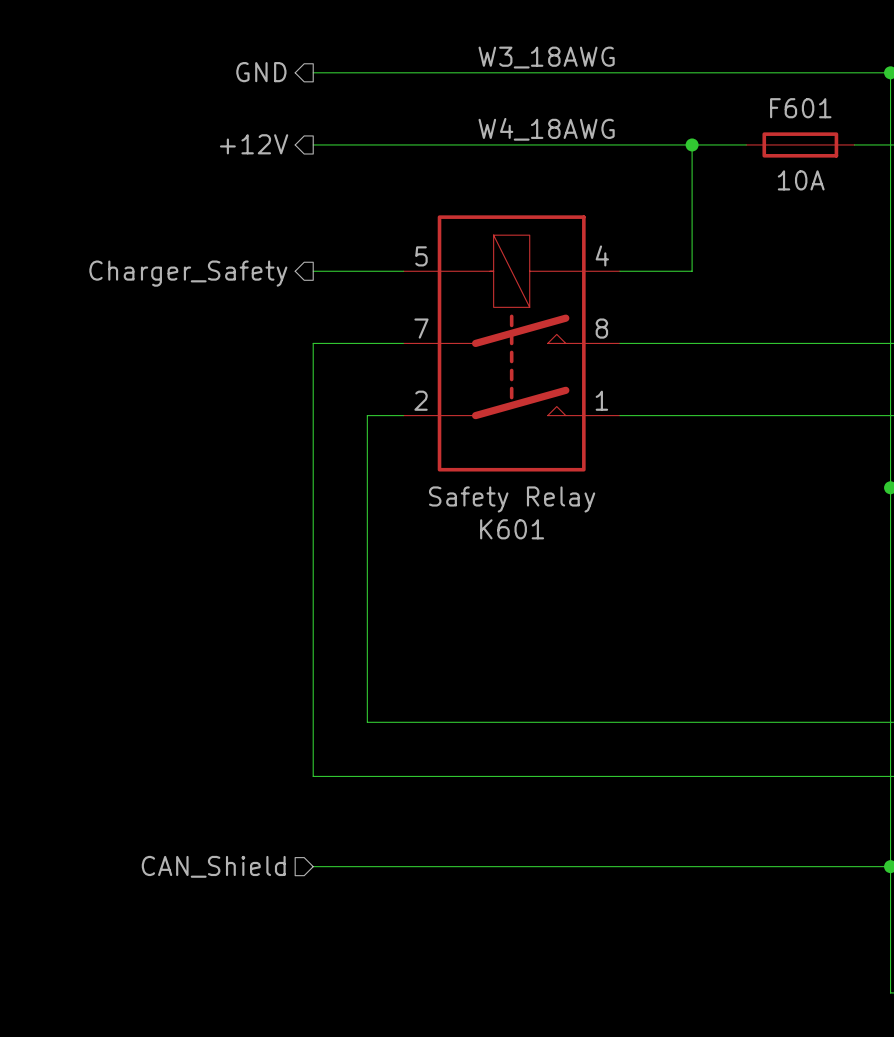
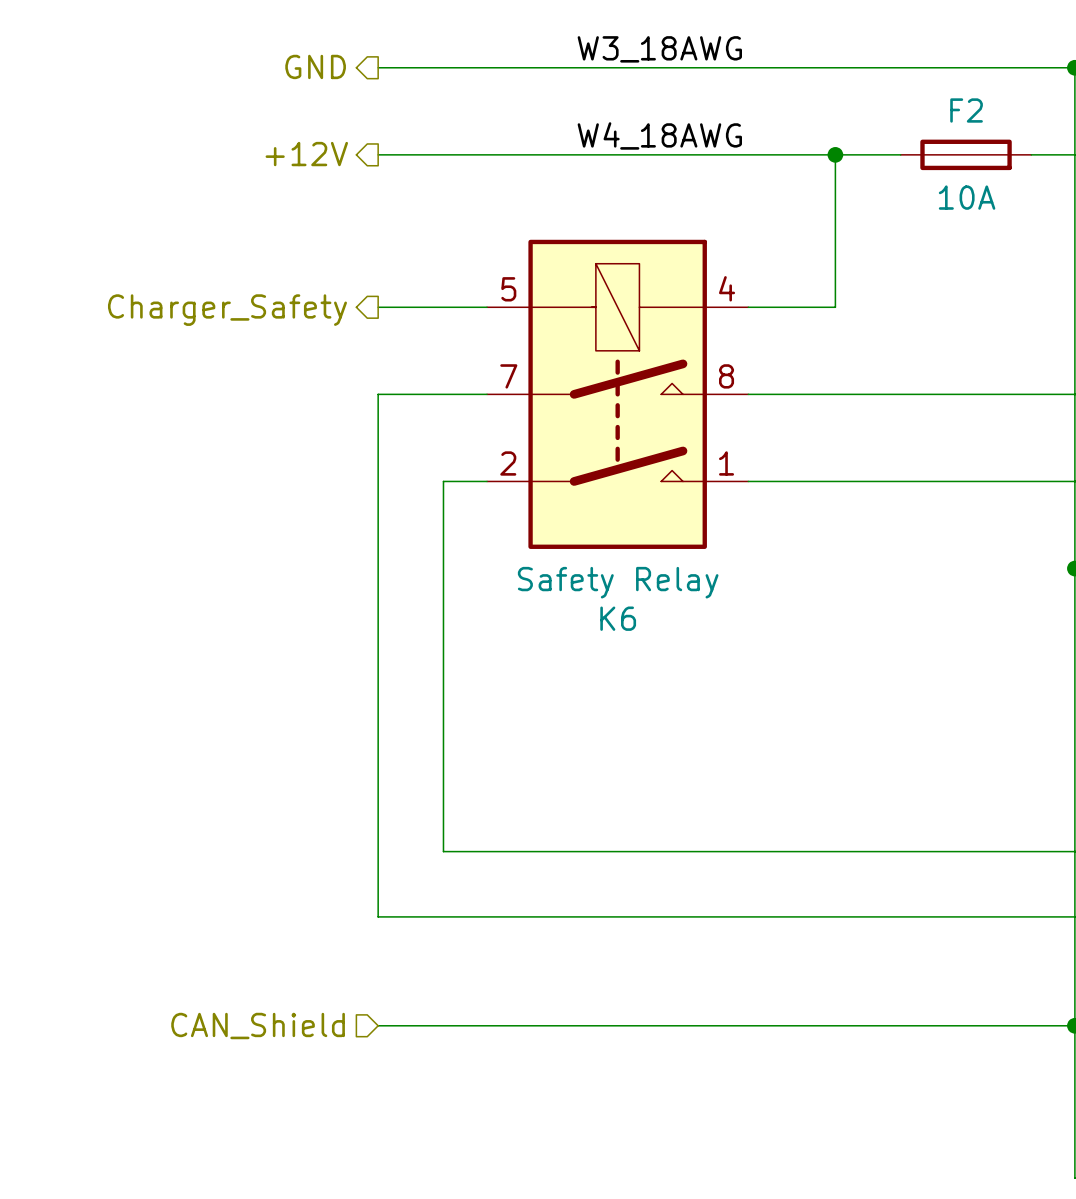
F601 name: F601 (800, 108) -> F2 (966, 110)
K601 name: K601 (512, 529) -> K6 (618, 618)

